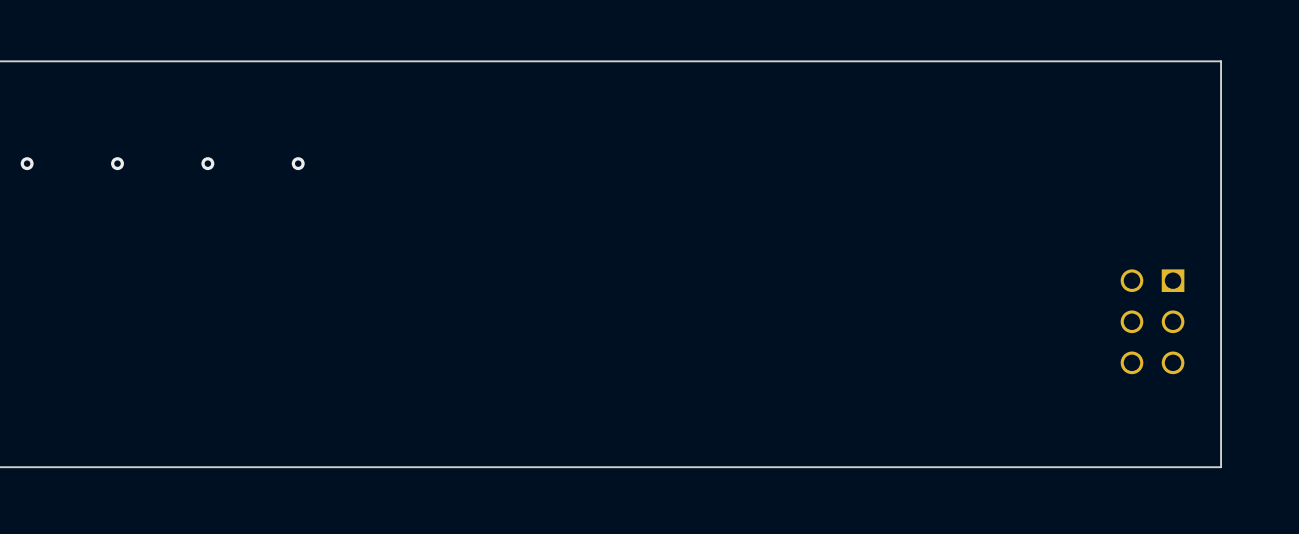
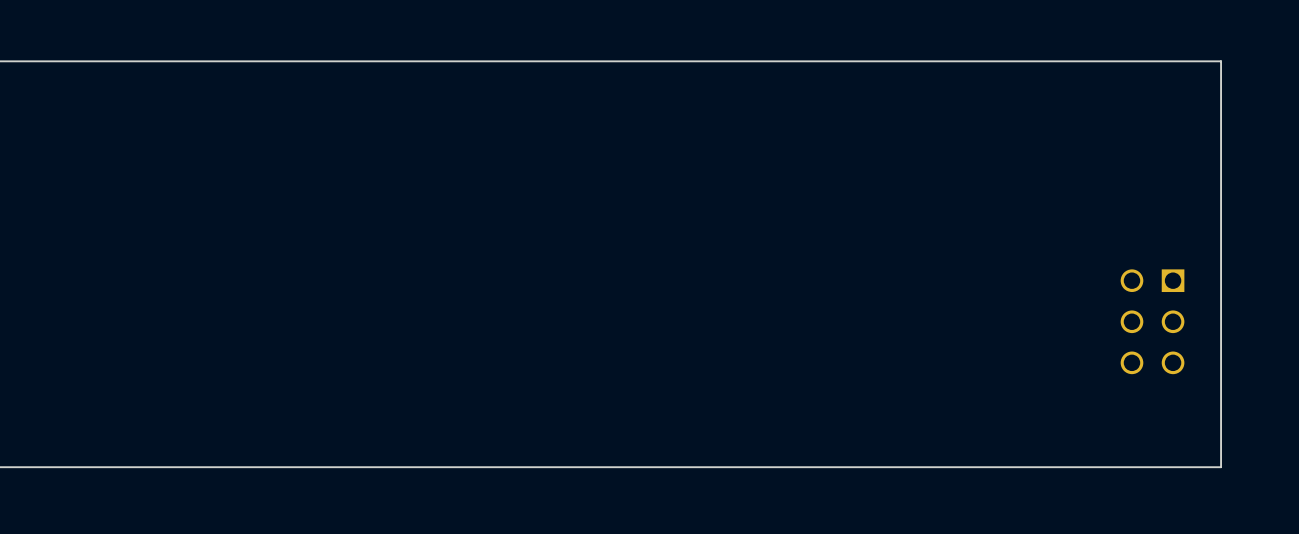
via: (27, 163) -> none
via: (117, 163) -> none
via: (207, 163) -> none
via: (298, 163) -> none

